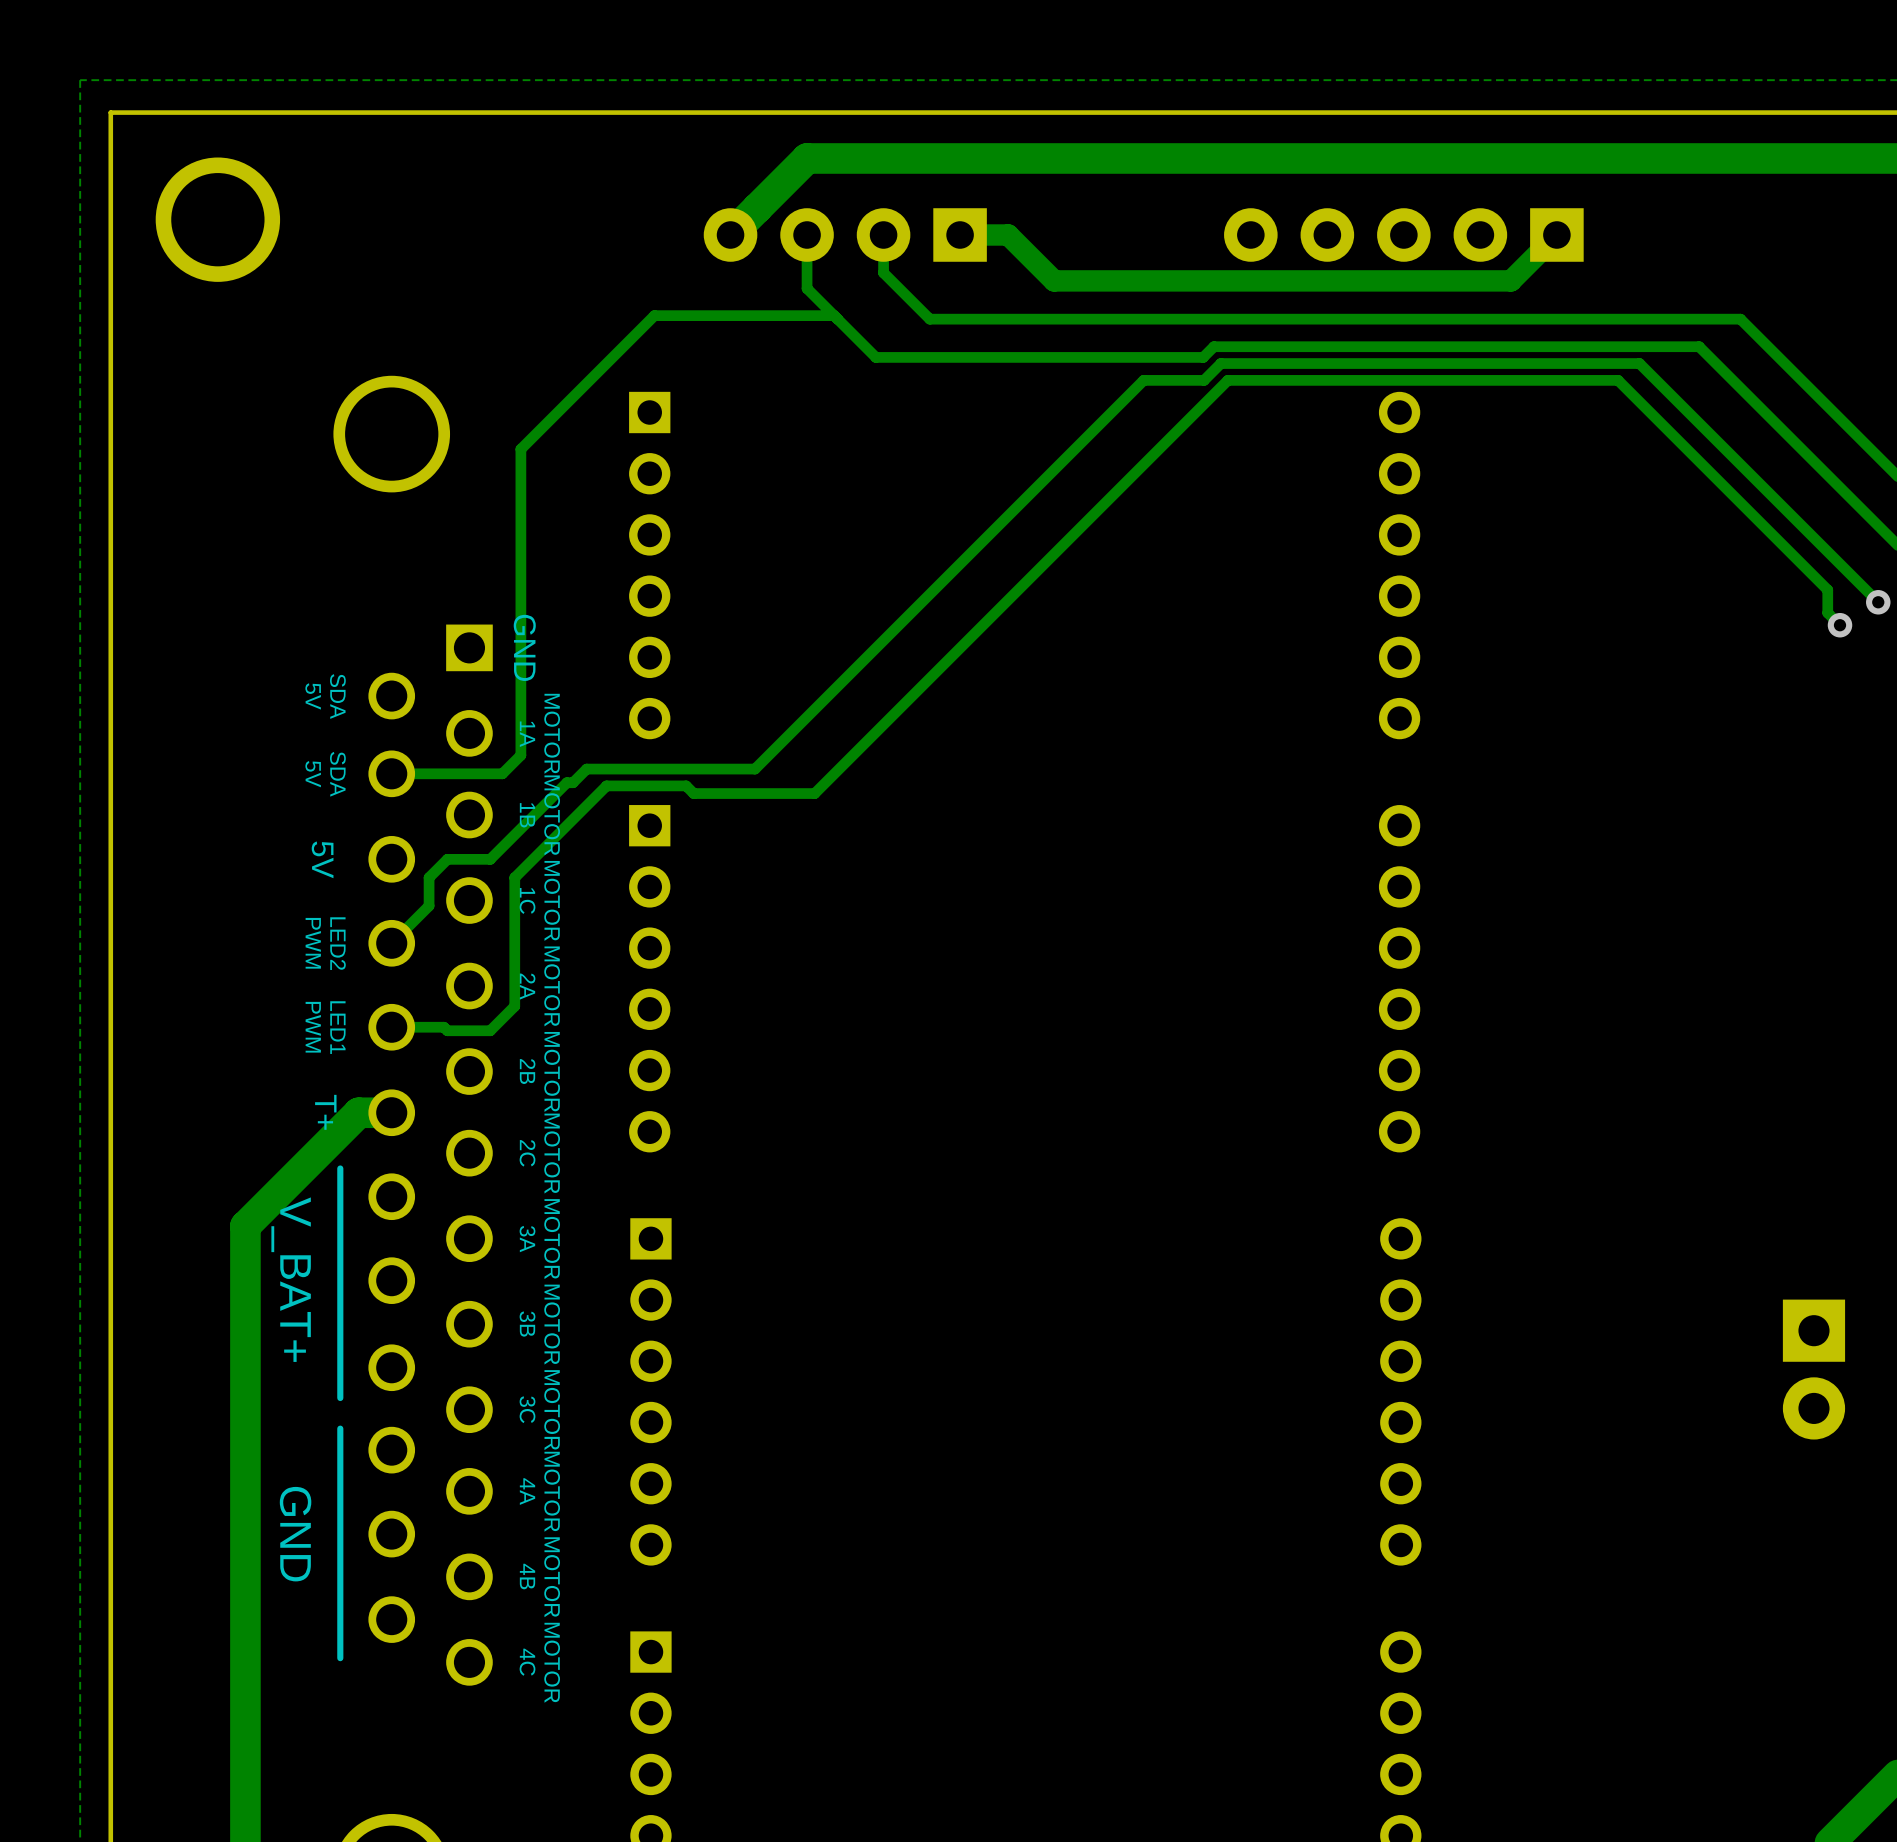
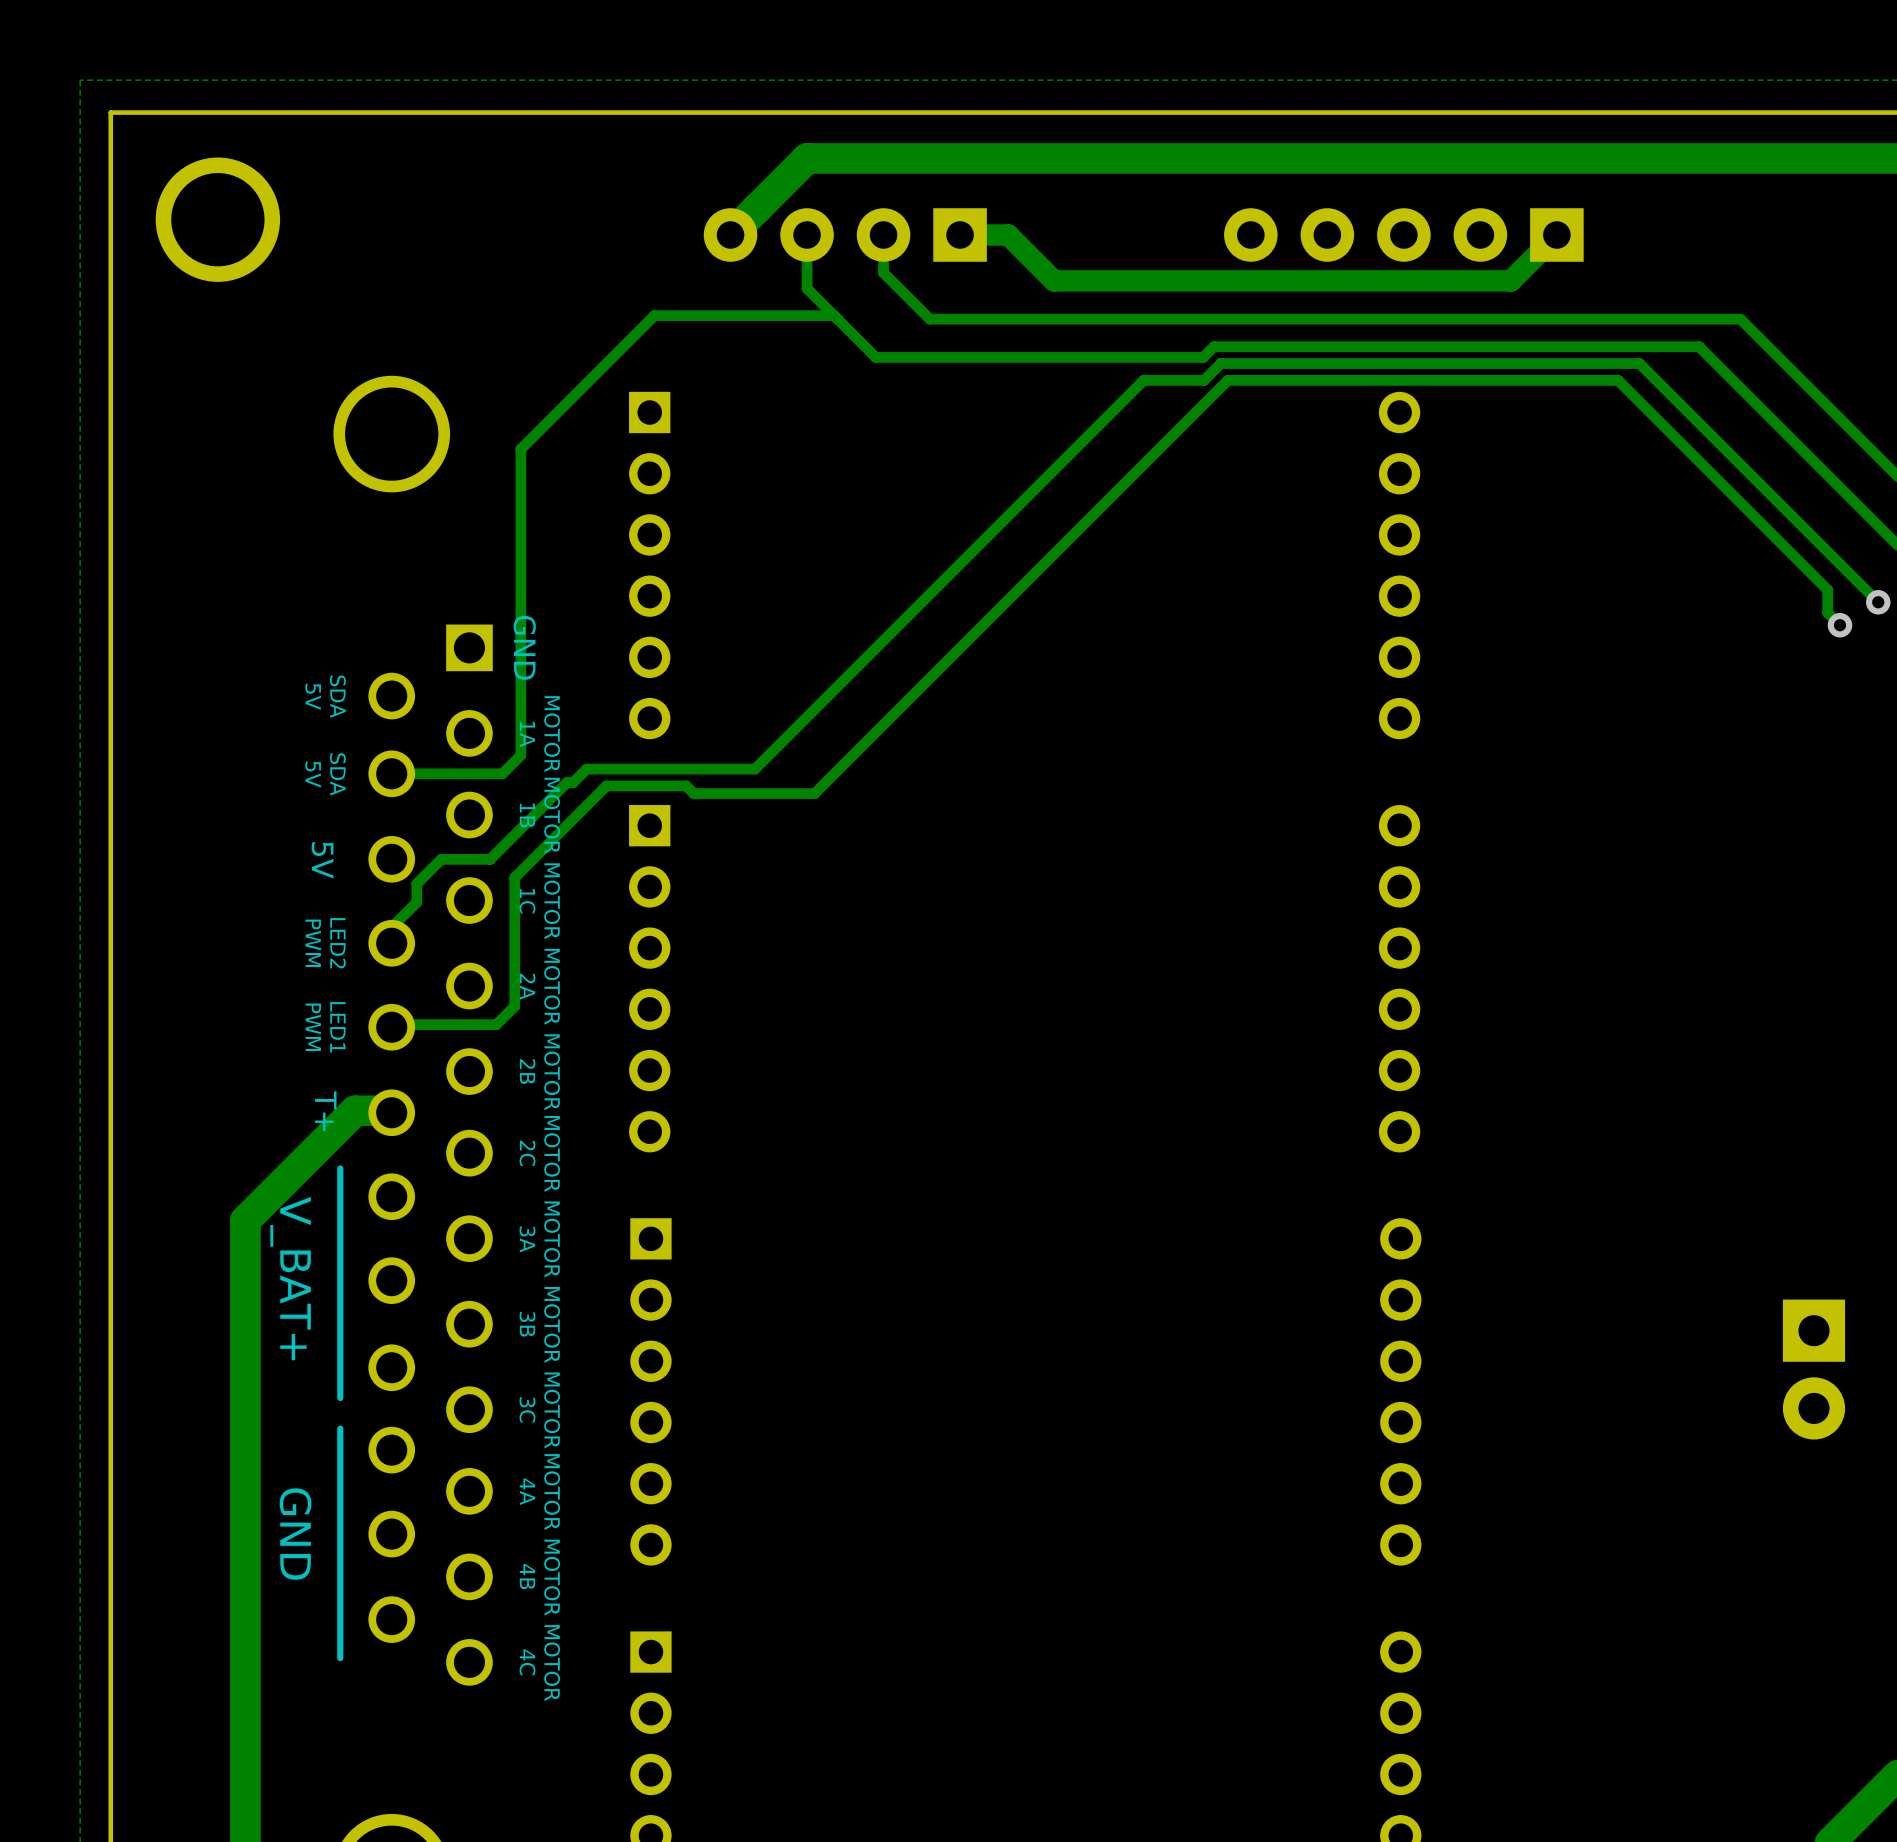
track: (447, 859) (429, 877) (429, 905) (391, 943) -> (447, 859) (441, 859) (416, 883) (416, 902) (377, 941)
track: (496, 1024) (490, 1030) (447, 1030) (443, 1027) (391, 1027) -> (496, 1024) (377, 1025)
track: (391, 1112) (358, 1112) (245, 1226) -> (377, 1110) (355, 1110) (245, 1220) (245, 1226)

